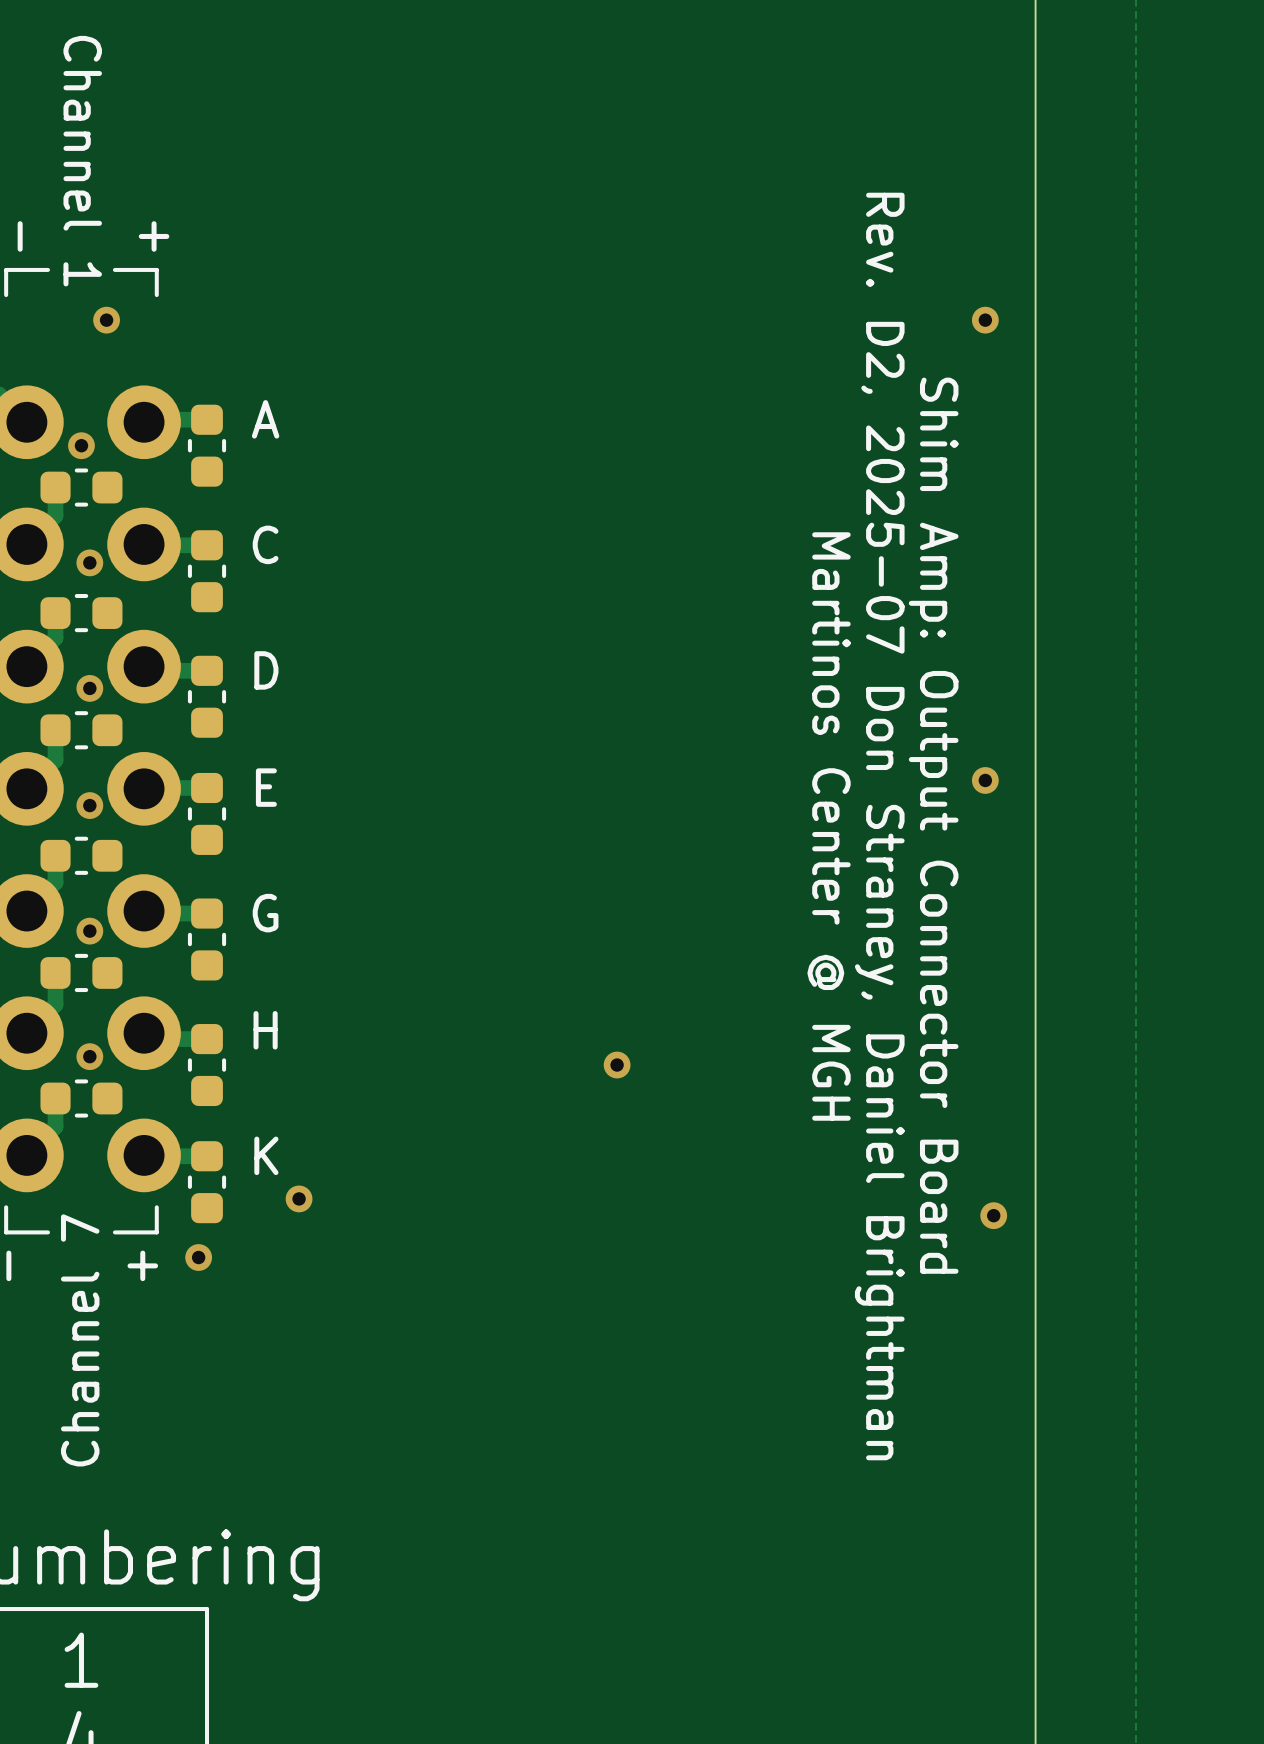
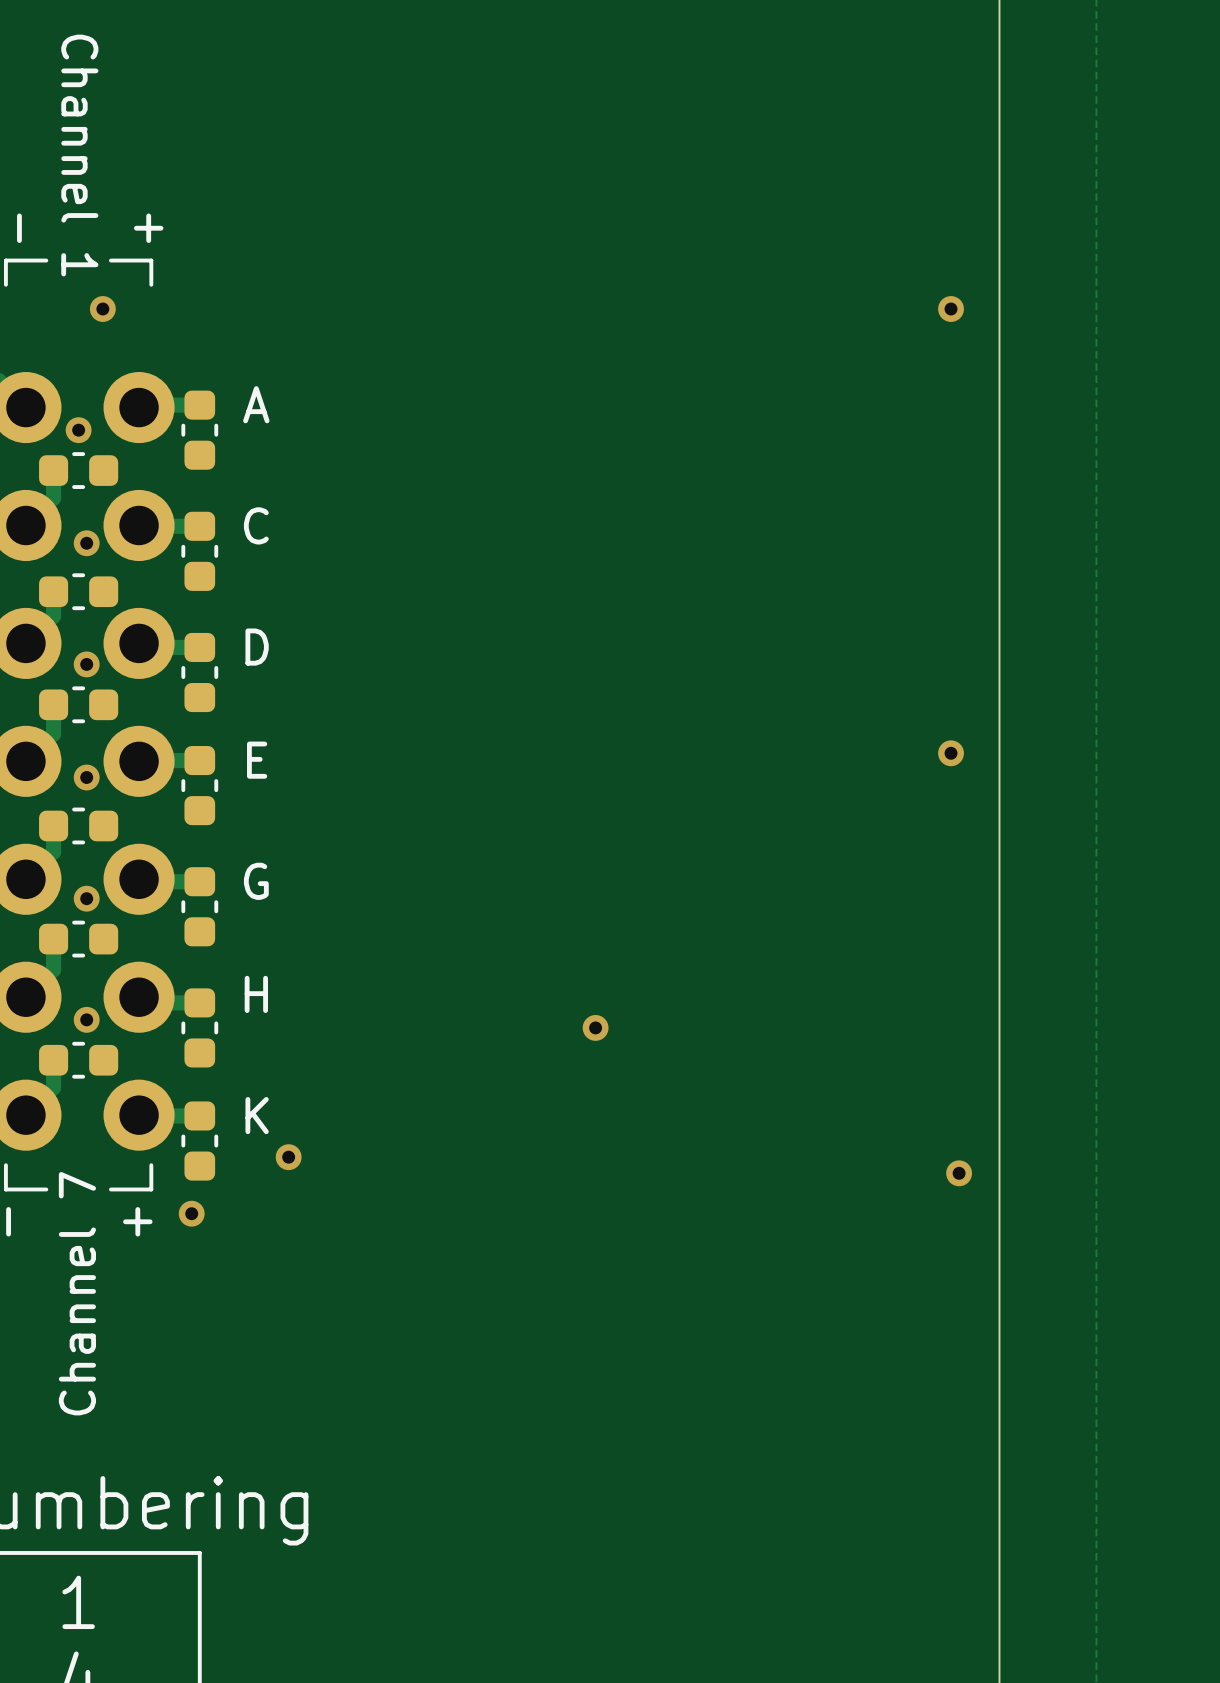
text: Shim Amp: Output Connector Board (933, 825) -> none
text: Martinos Center @ MGH (829, 826) -> none
text: Rev. D2, 2025-07 Don Straney, Daniel Brightman (879, 826) -> none

